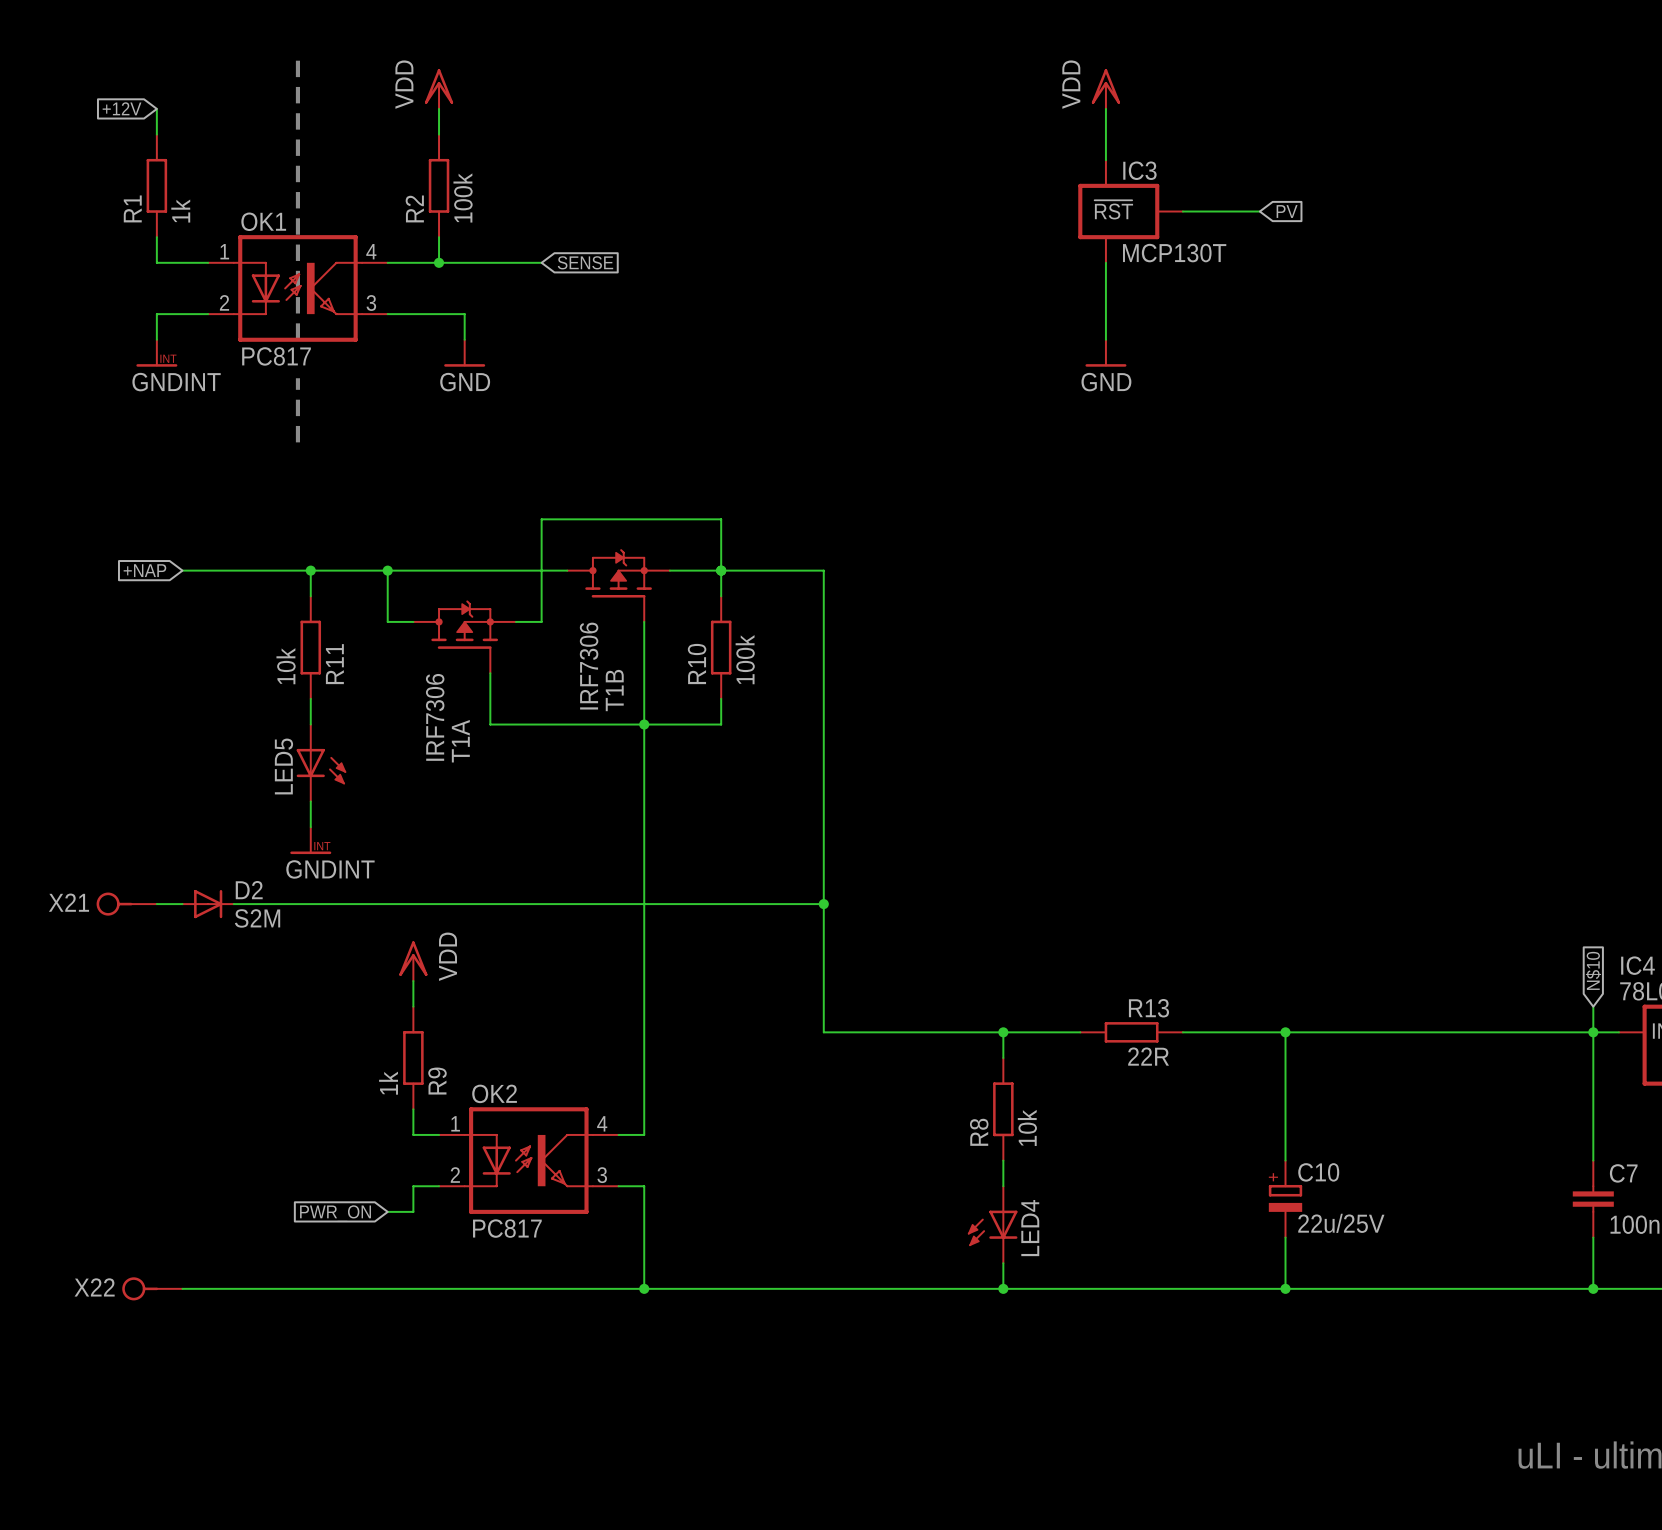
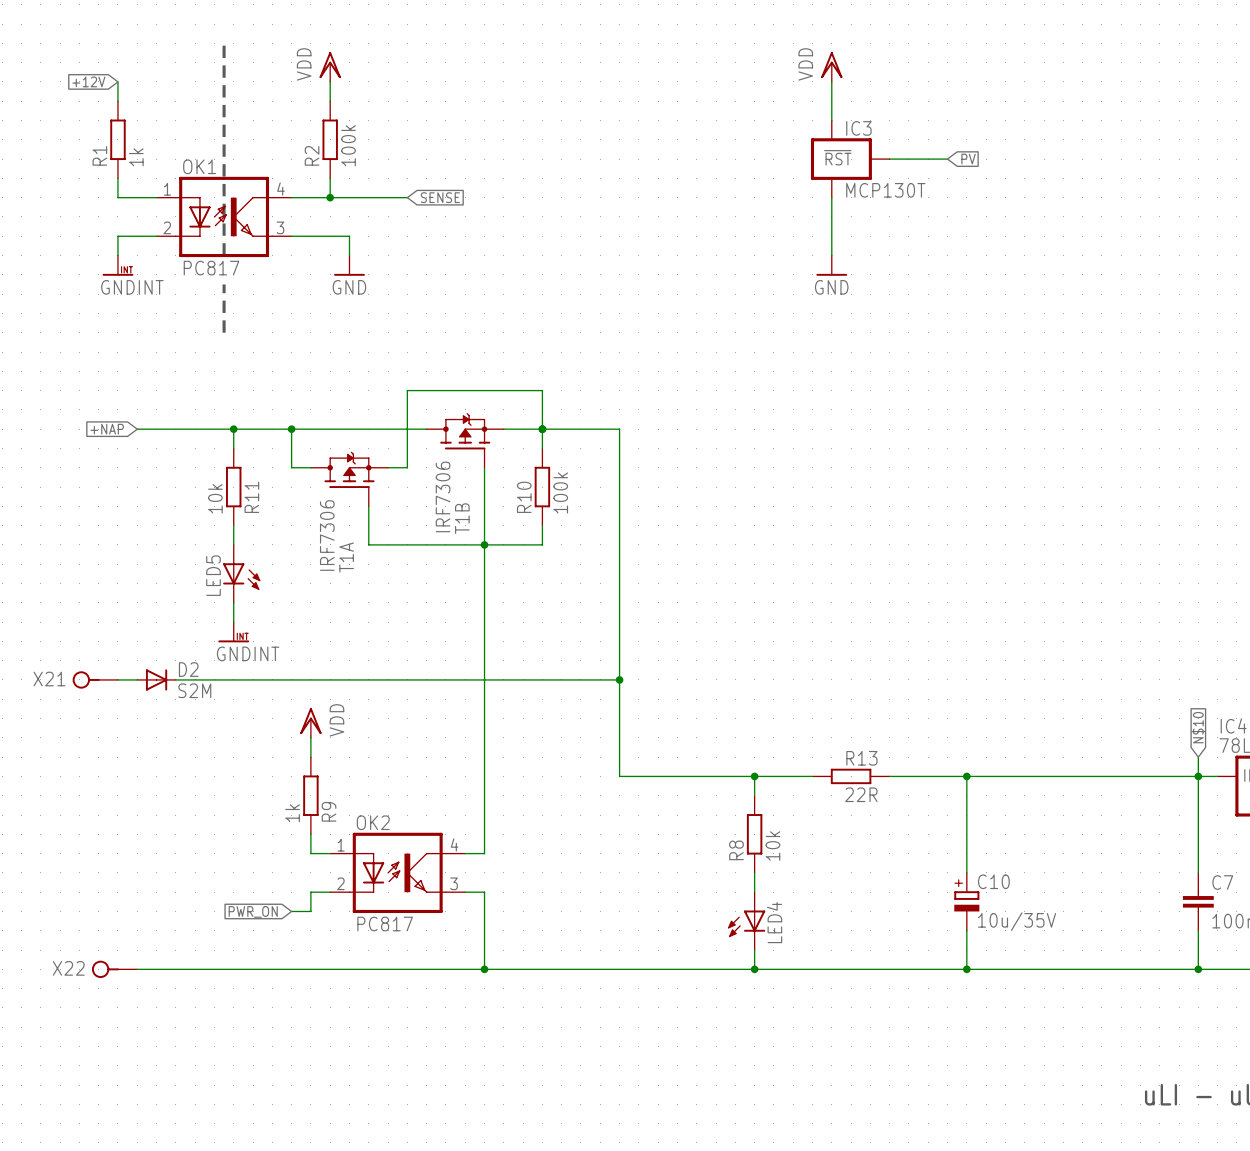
C10 value: 22u/25V (1341, 1223) -> 10u/35V (1017, 921)

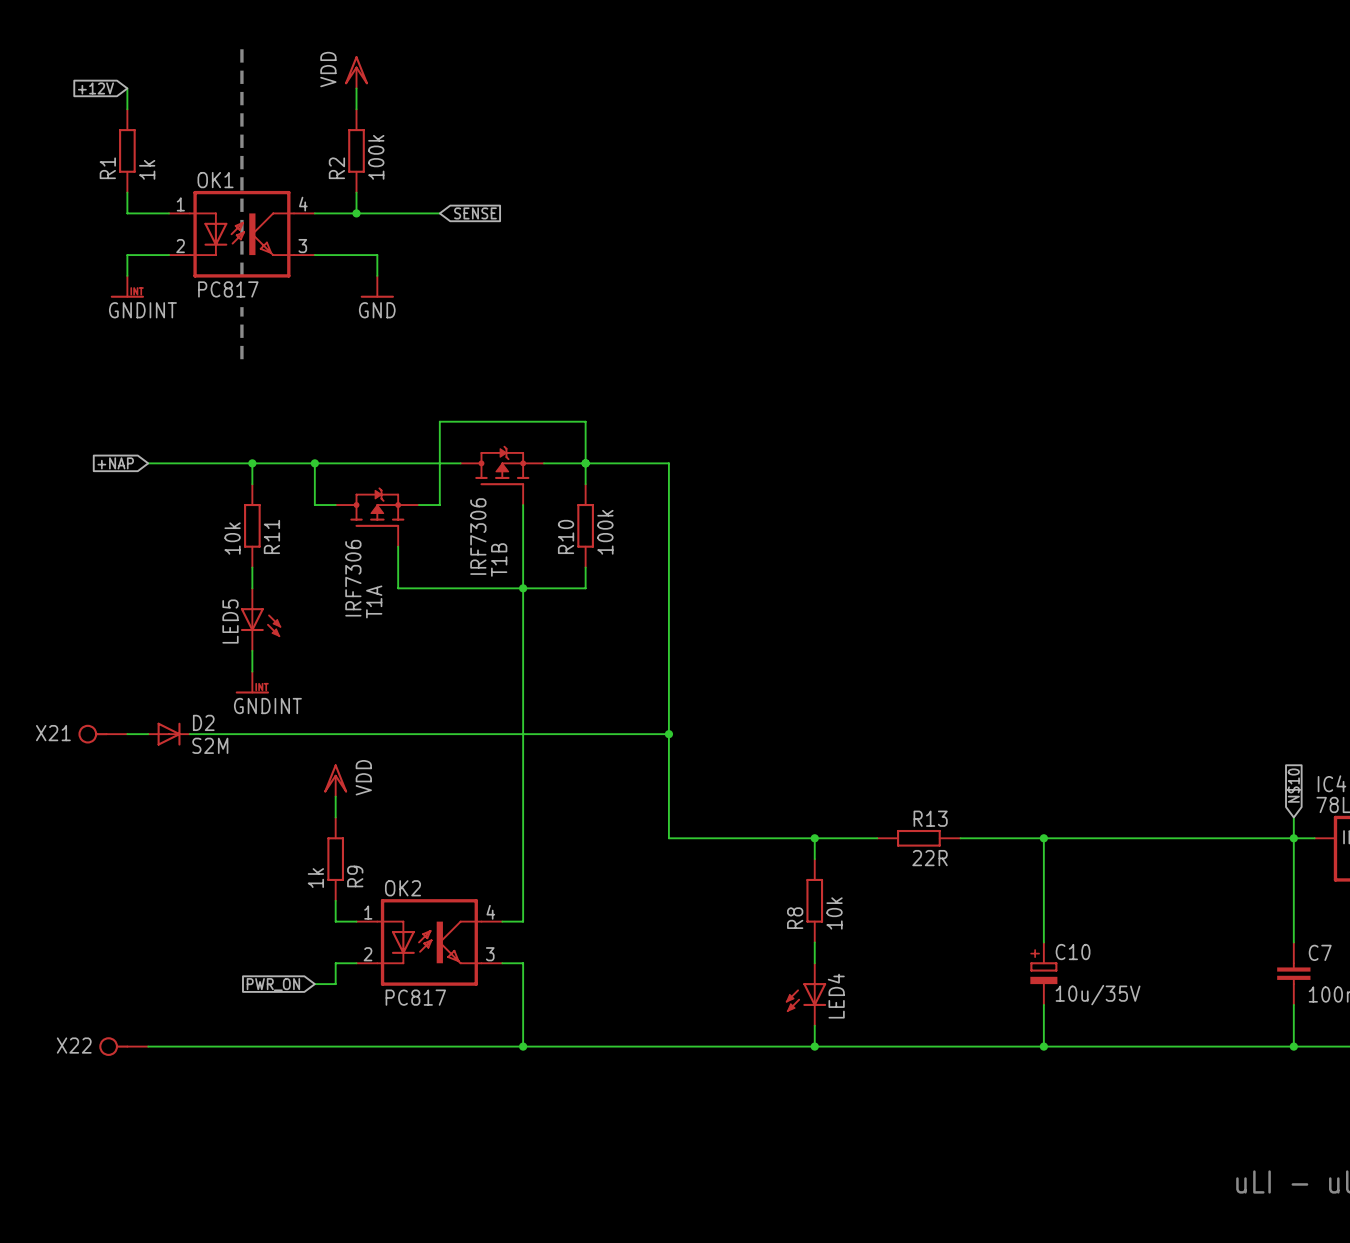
power symbol: VDD (831, 66) -> none
wire: (831, 81) (831, 120) -> none
IC3: MCP130T (850, 159) -> none
wire: (889, 159) (947, 159) -> none
global label: PV (968, 159) -> none
wire: (831, 197) (831, 255) -> none
power symbol: GND (831, 265) -> none

